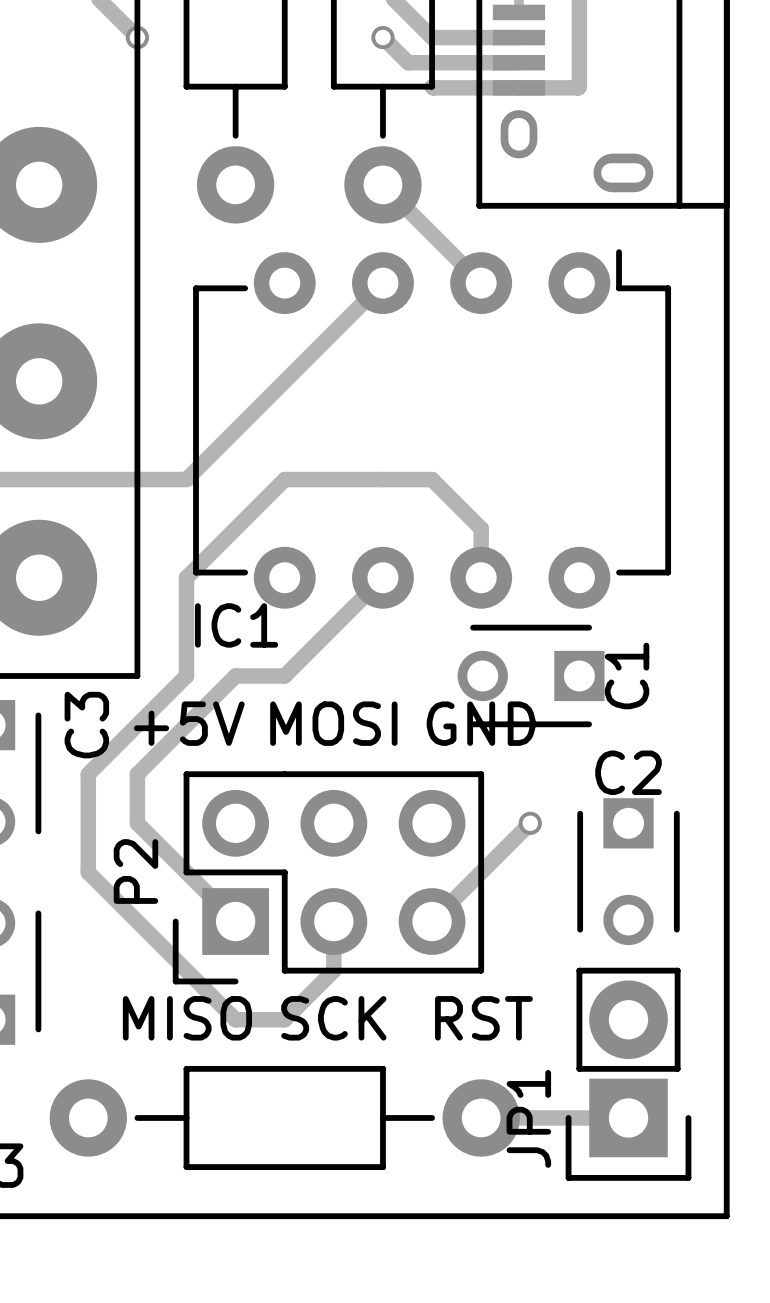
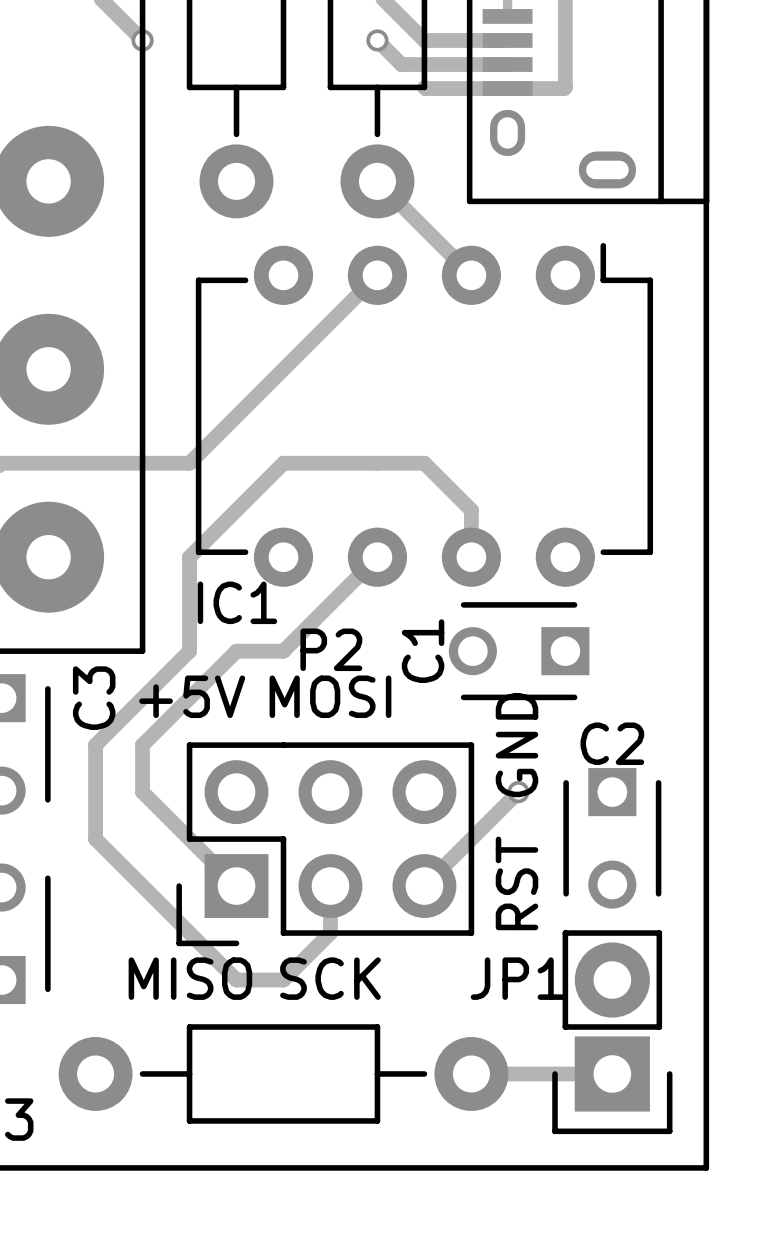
C1 name position: C1 (627, 675) -> C1 (423, 651)
text rotation: 0° (481, 723) -> 90° counterclockwise (517, 745)
P2 name rotation: 0° (135, 871) -> 90° clockwise (331, 649)
P2 name position: P2 (135, 871) -> P2 (331, 649)
text rotation: 0° (483, 1018) -> 90° counterclockwise (517, 883)
JP1 name rotation: 0° (528, 1118) -> 90° clockwise (517, 978)

